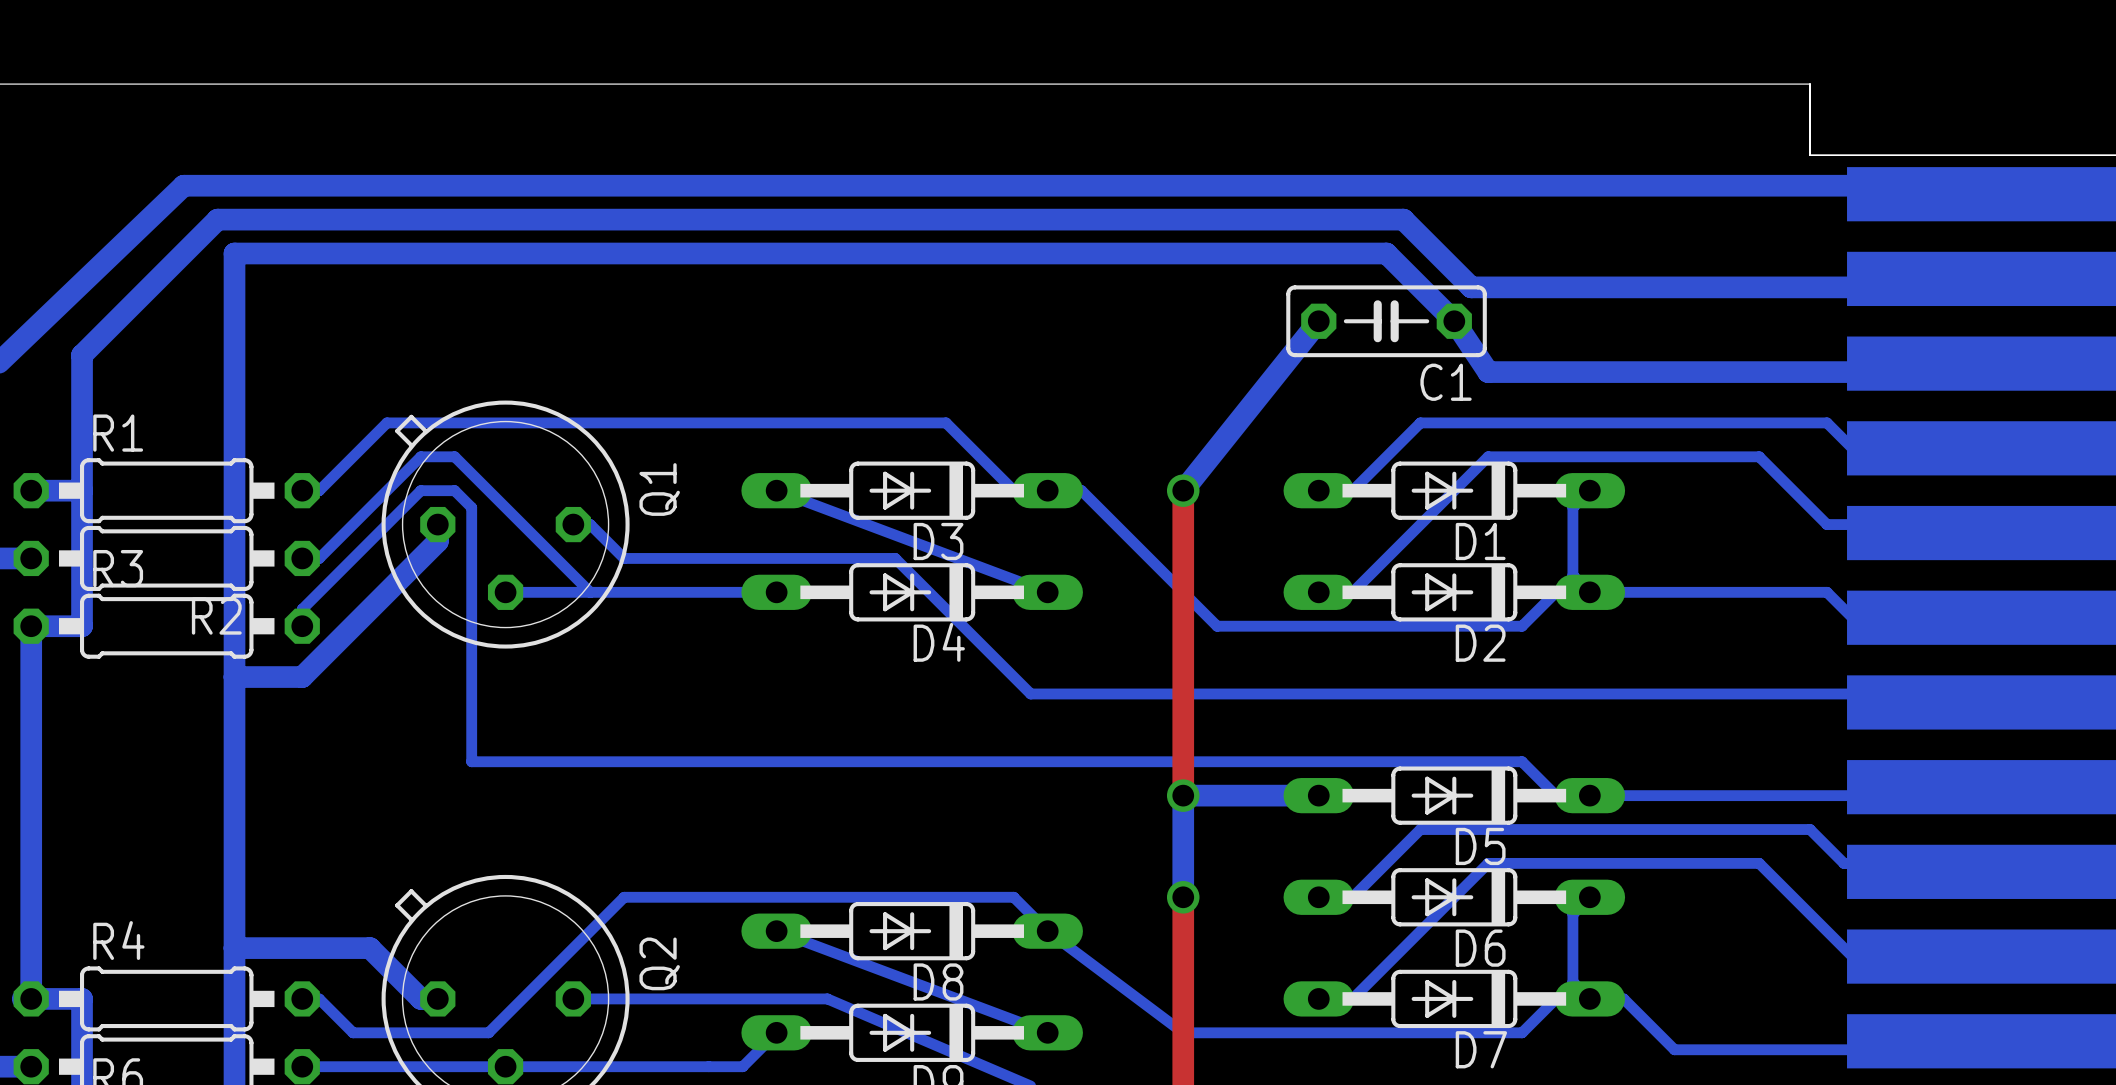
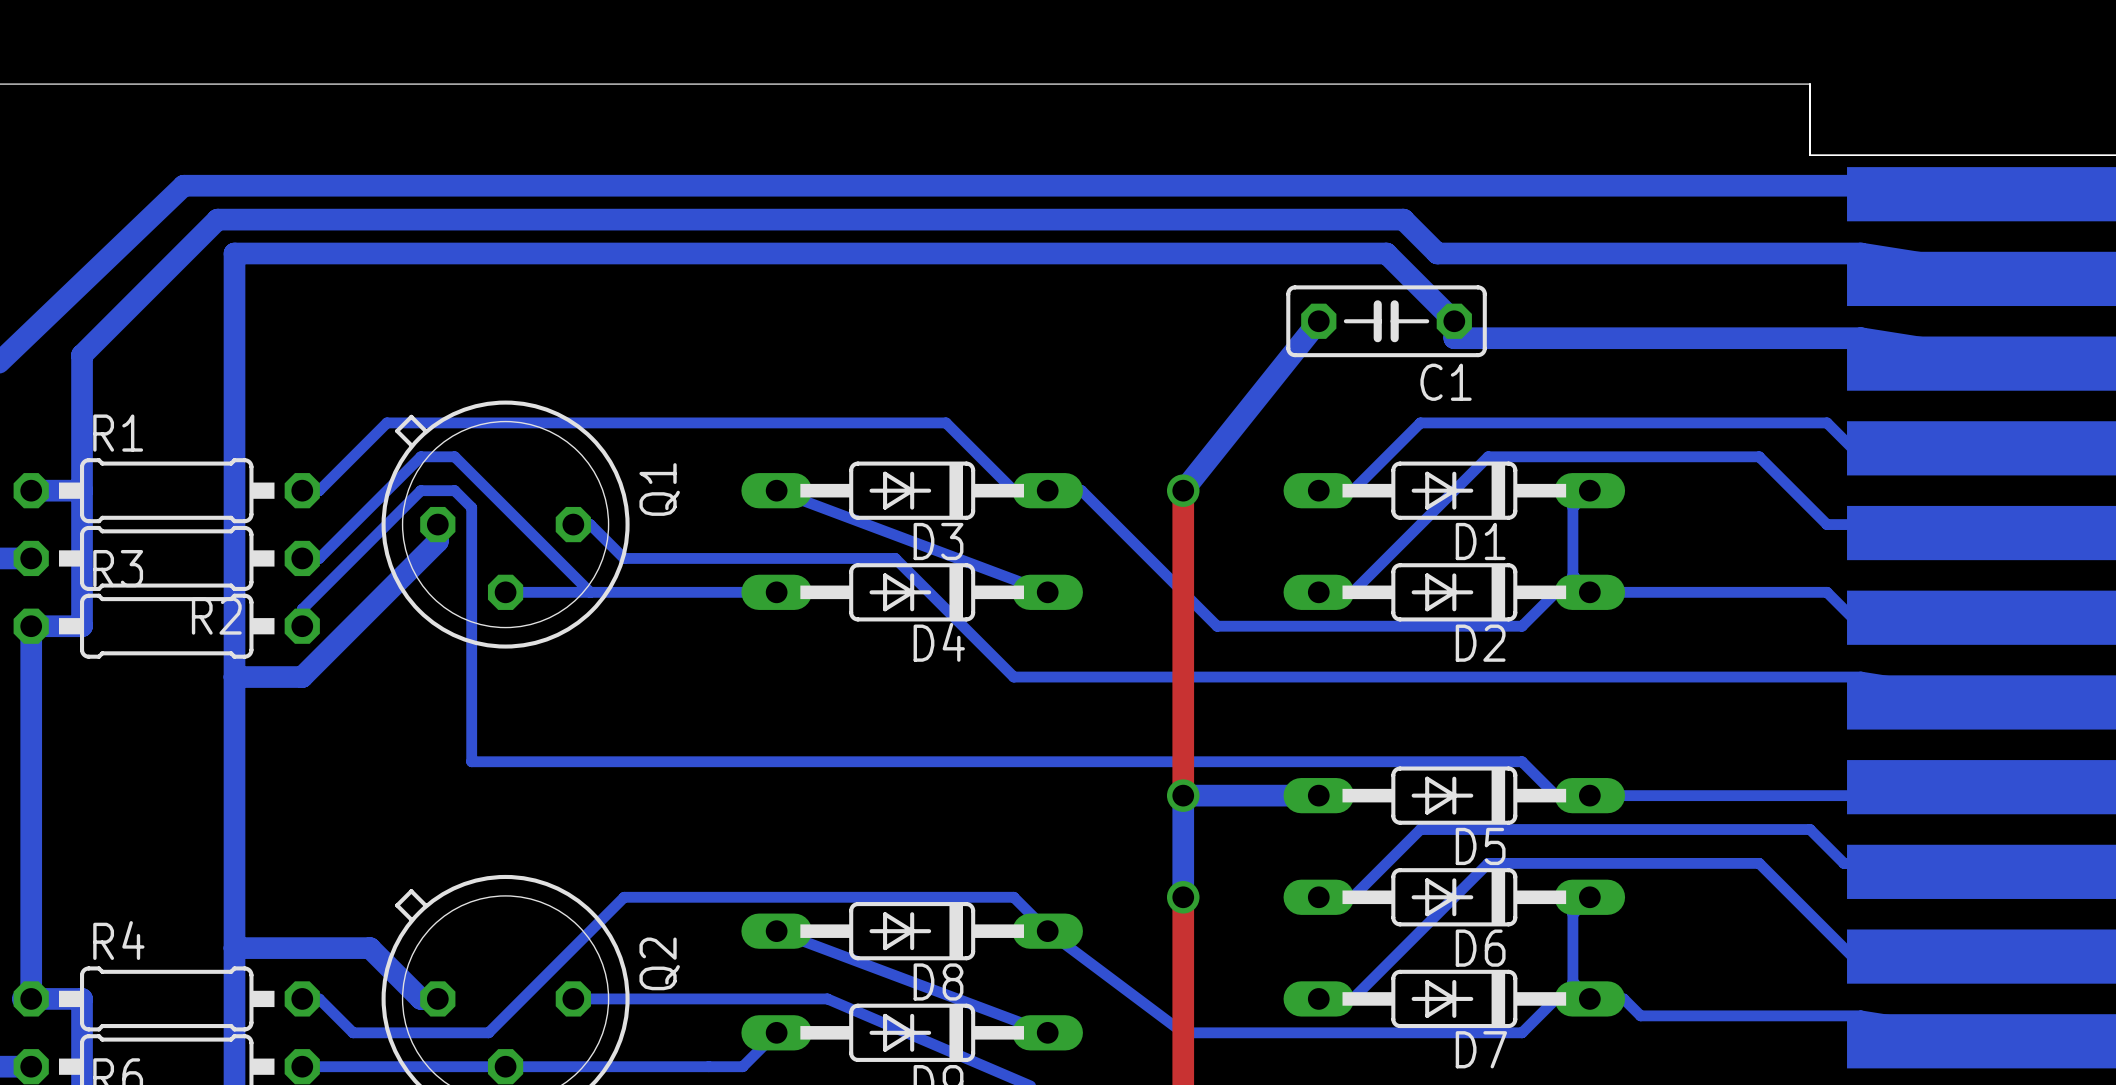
bottom track: (1437, 253) (1471, 287) (1894, 287) (2021, 278) -> (1437, 253) (1860, 253) (2021, 278)
bottom track: (1454, 321) (1488, 372) (1894, 372) (2021, 363) -> (1454, 321) (1454, 338) (1860, 338) (2021, 363)
bottom track: (1013, 677) (1030, 693) (1877, 693) (2021, 702) -> (1013, 677) (1860, 677) (2021, 702)
bottom track: (1640, 1015) (1674, 1049) (1894, 1049) (2021, 1041) -> (1640, 1015) (1860, 1015) (2021, 1041)

